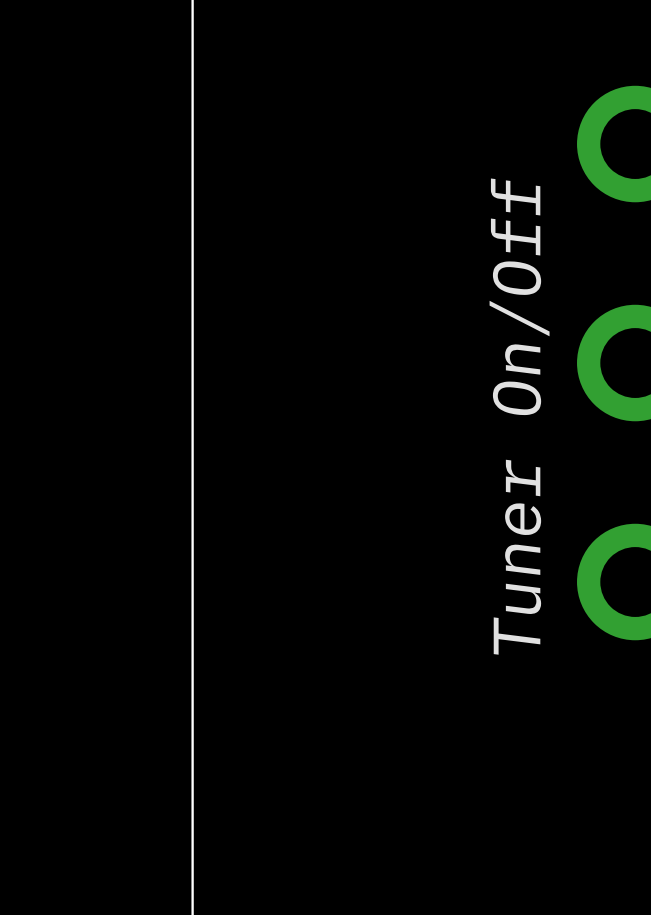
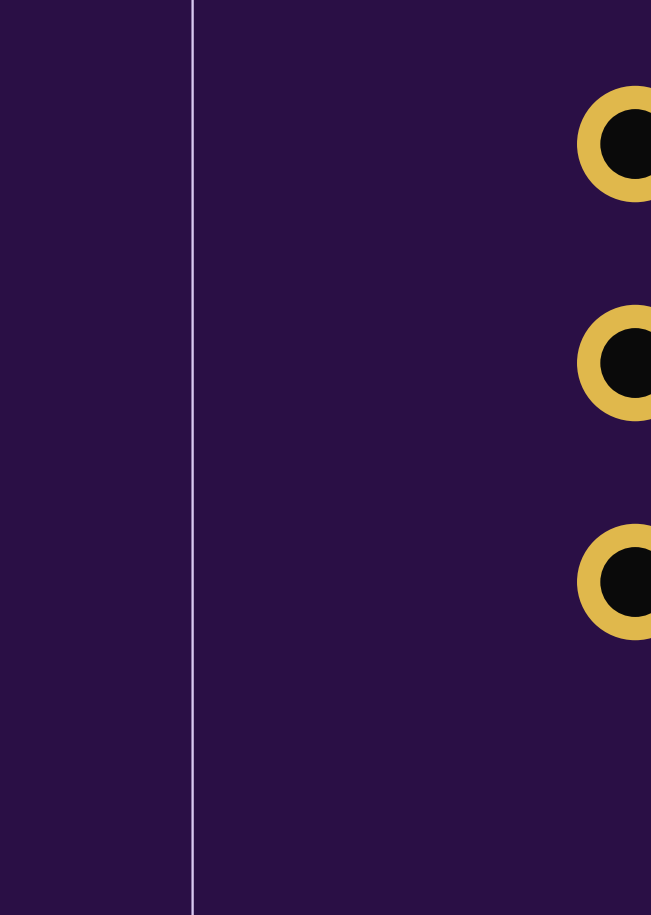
part text: Tuner On/Off (519, 416) -> none

